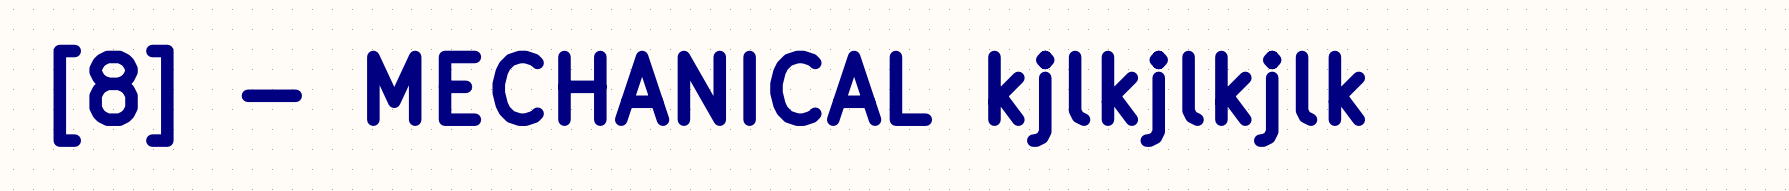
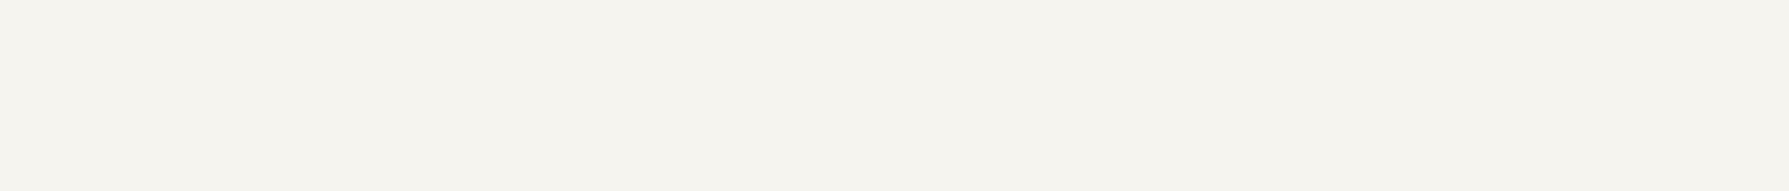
text: [8] - MECHANICAL kjlkjlkjlk (709, 95) -> none

